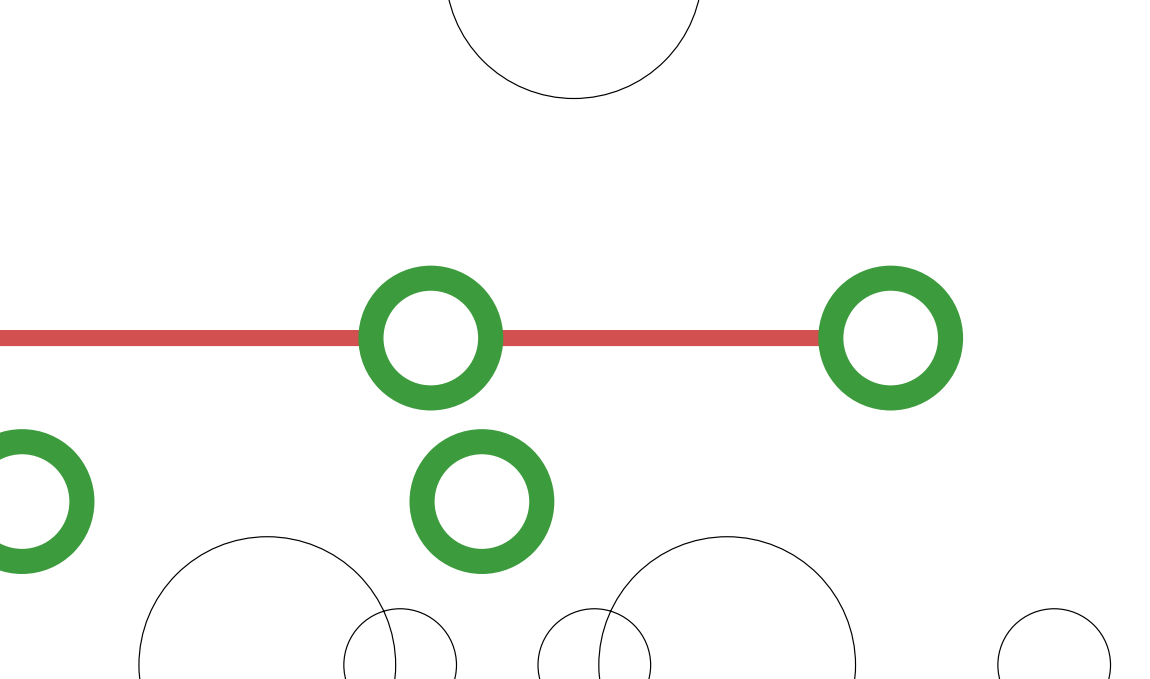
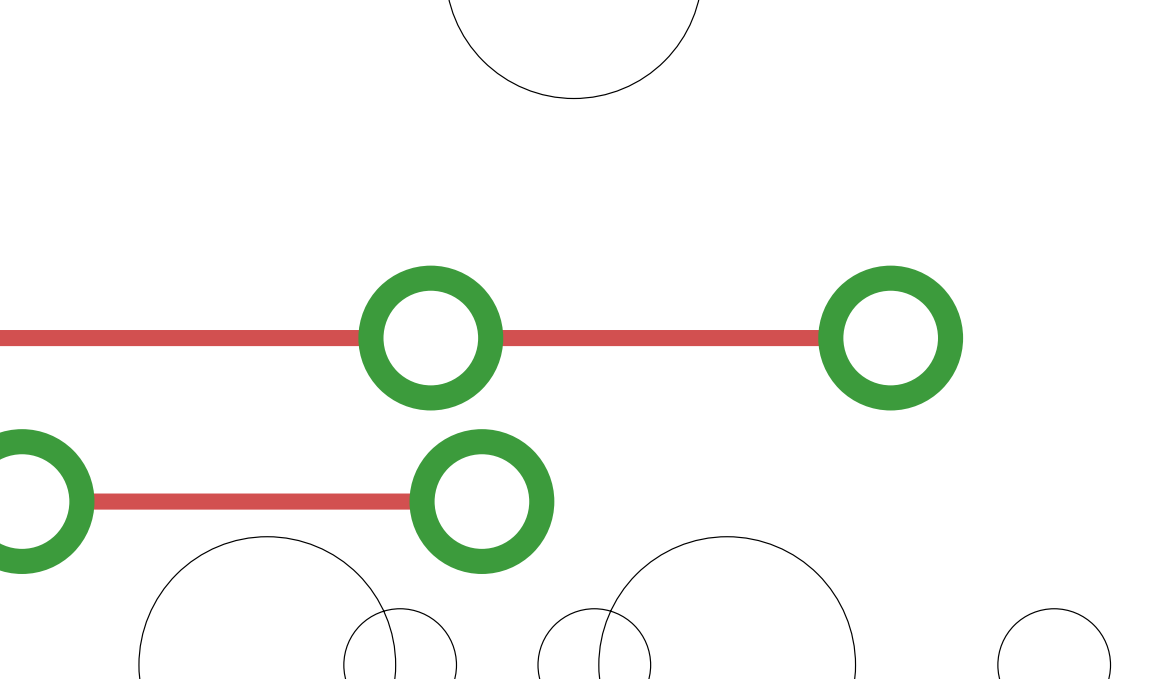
track: none -> (22, 501) (481, 501)

